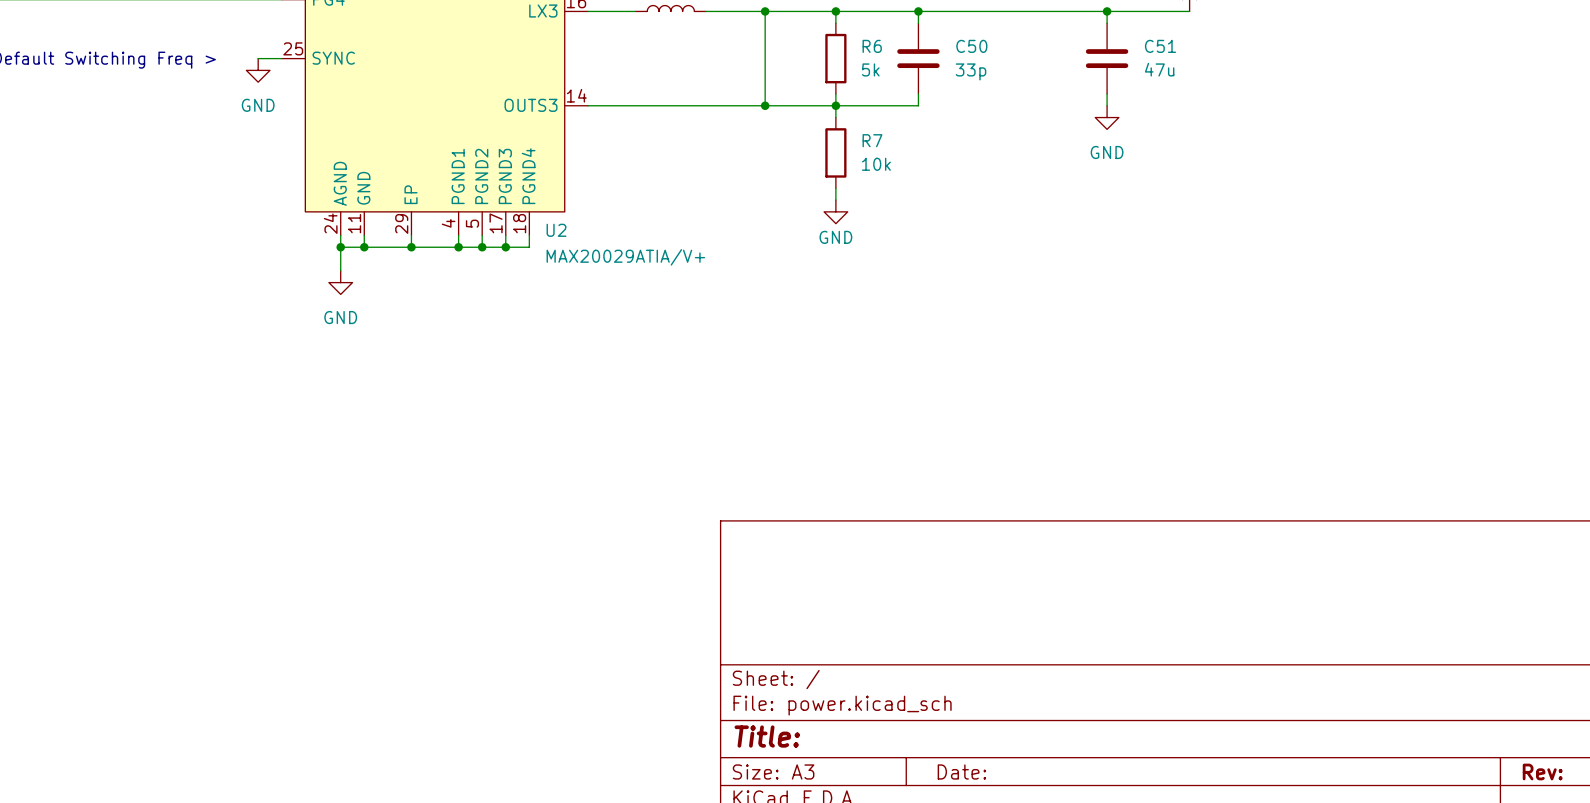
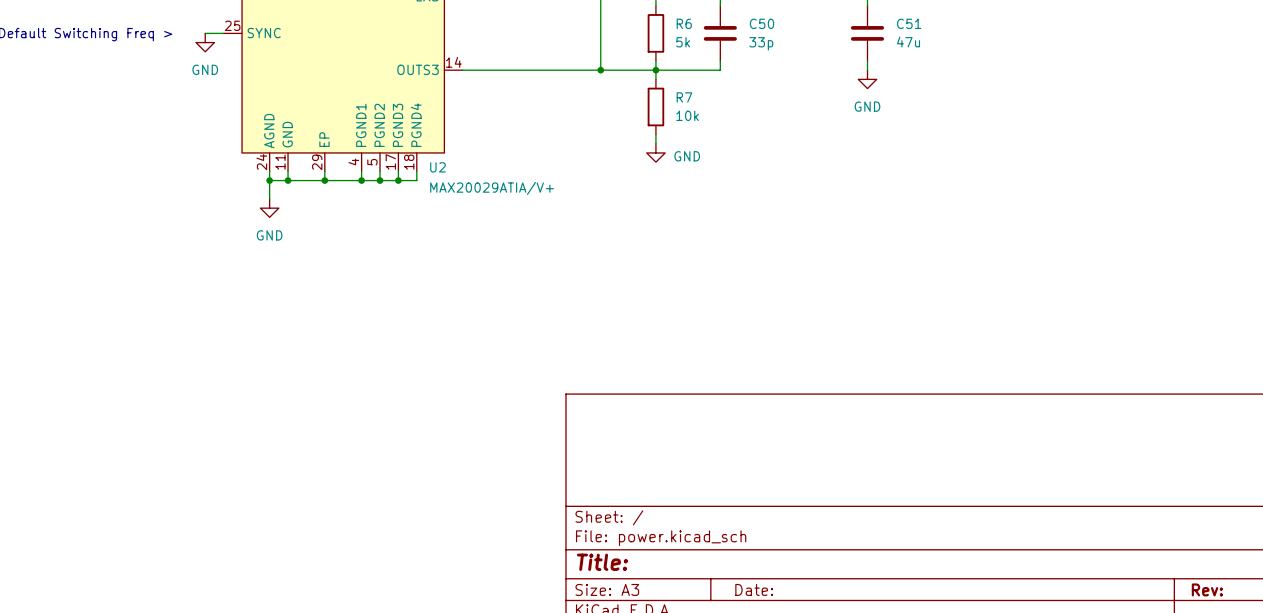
power symbol text position: GND (835, 237) -> GND (687, 156)

